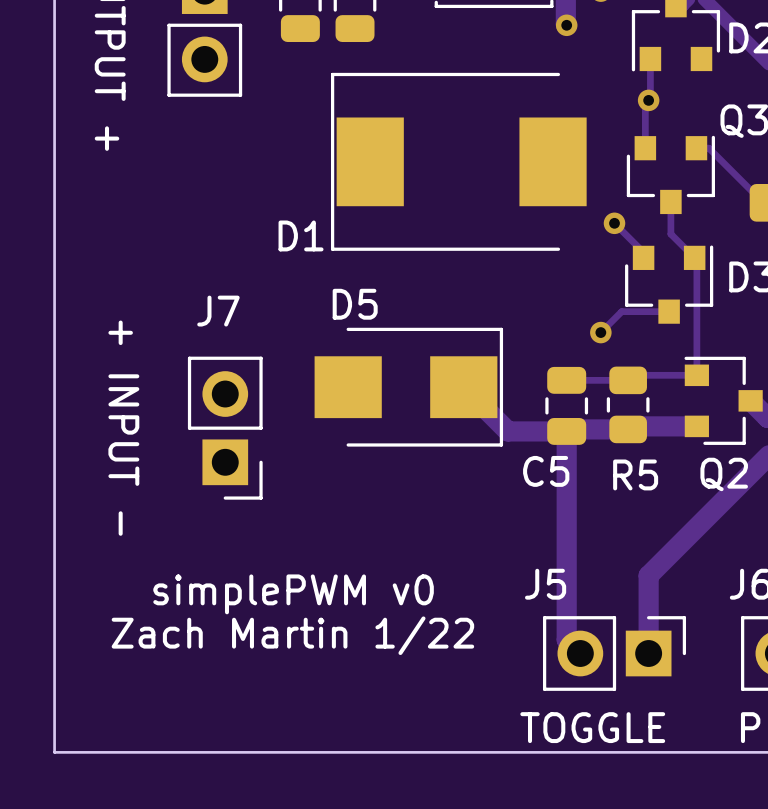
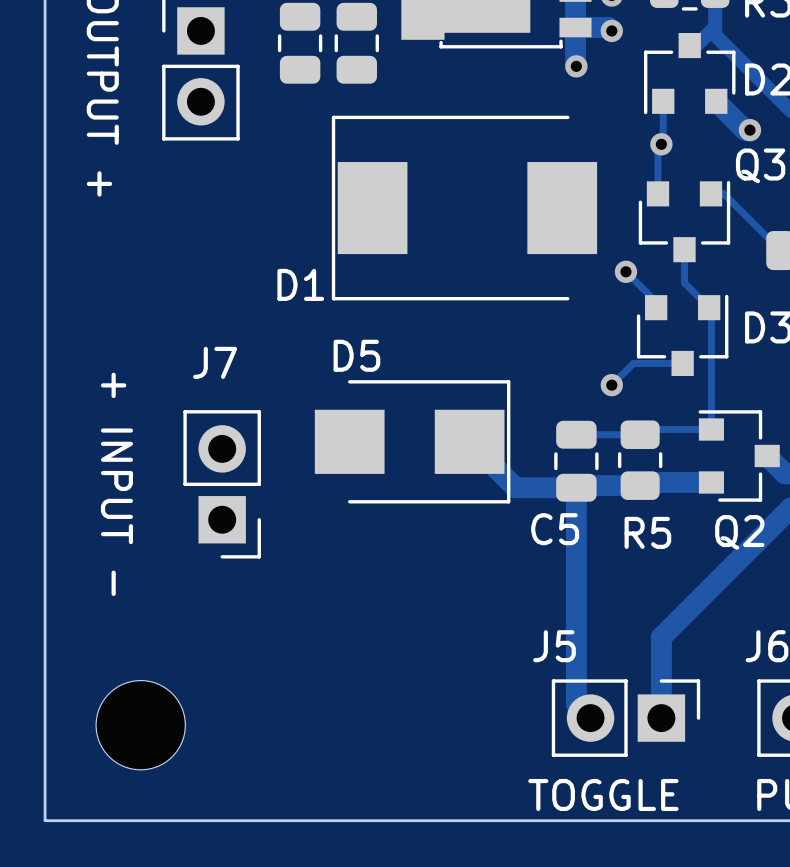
track: none -> (716, 101) (745, 130) (749, 130)
via: none -> (749, 130)
text: simplePWM v0 (293, 594) -> none
text: Zach Martin 1/22 (292, 635) -> none
part: none -> (140, 725)

